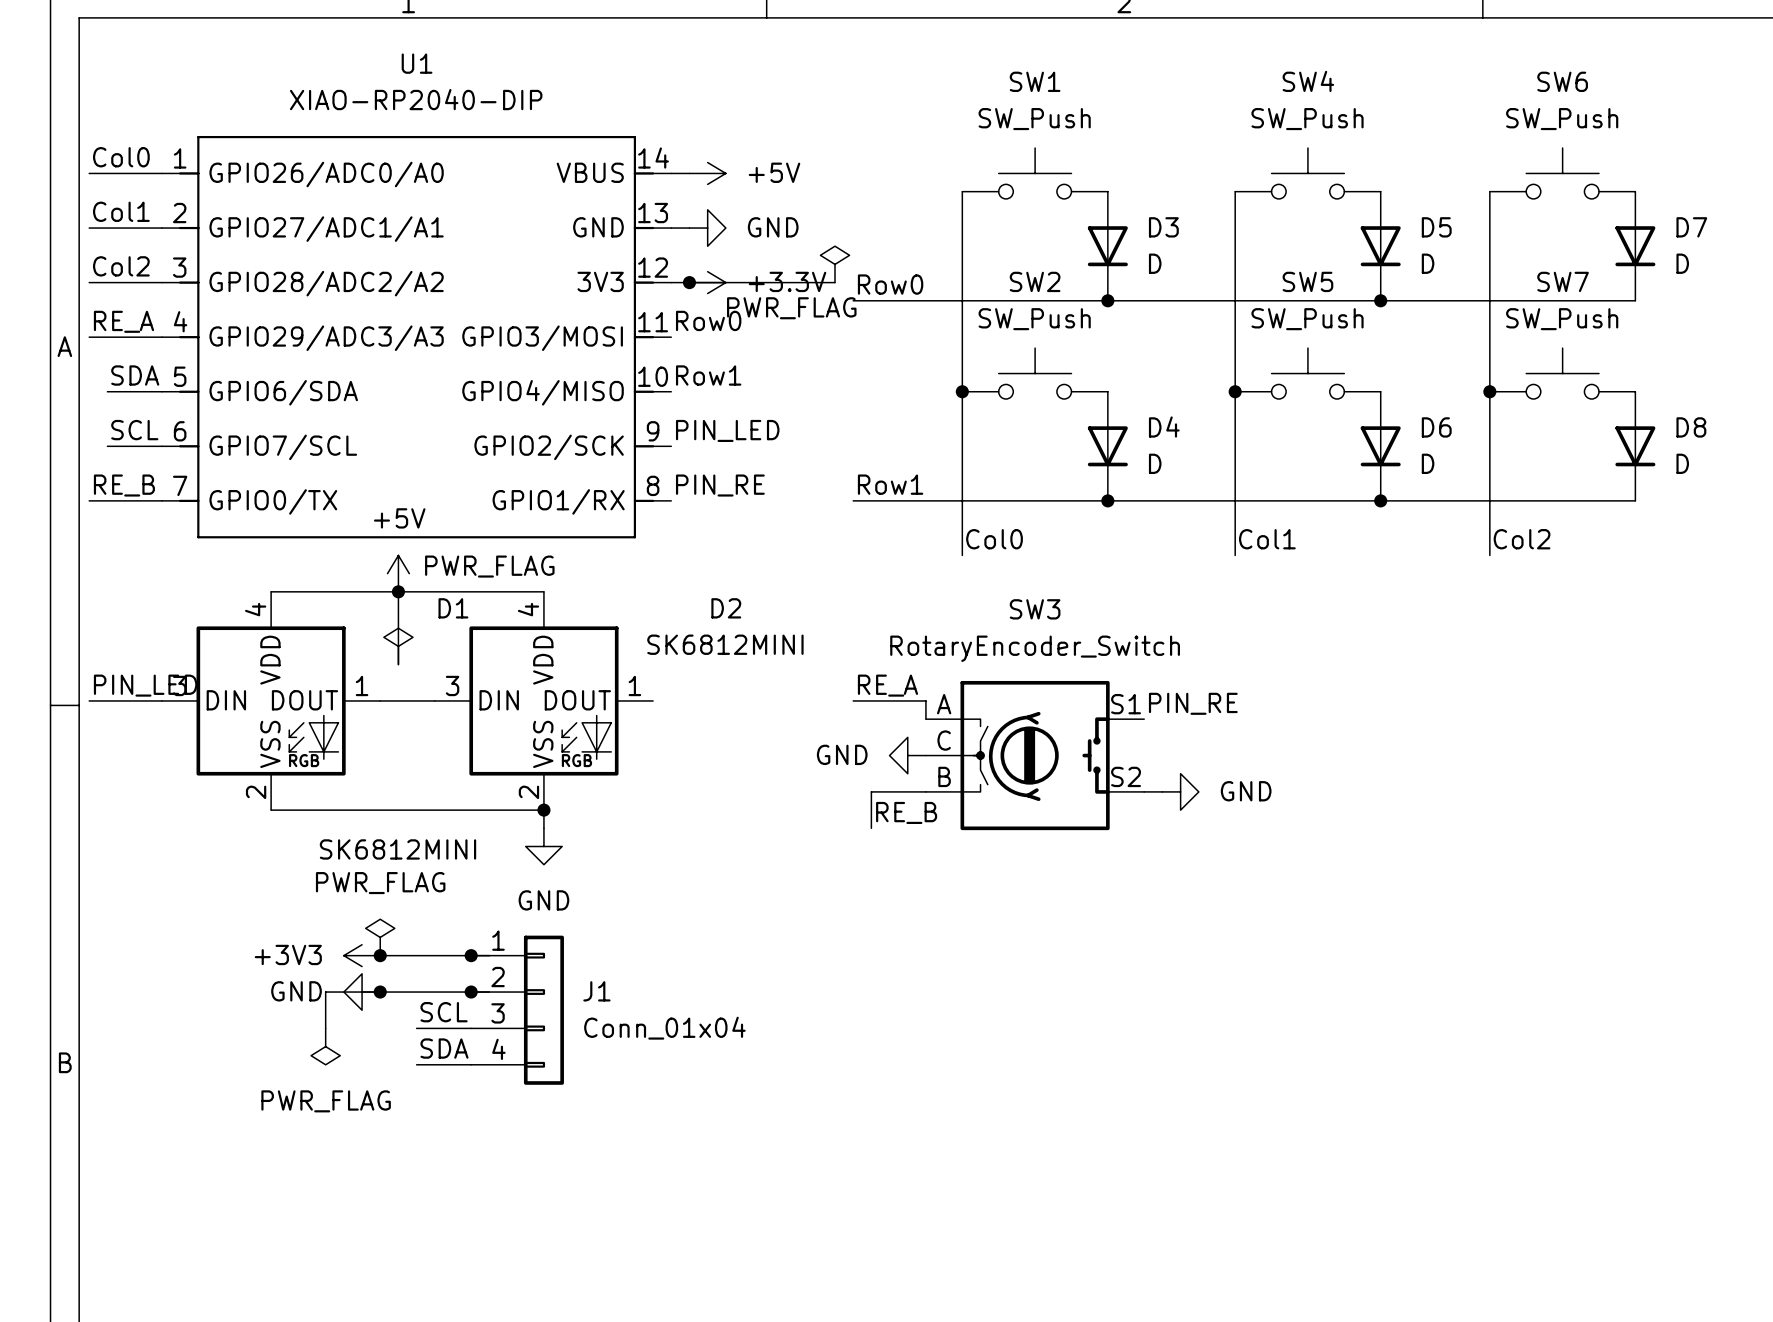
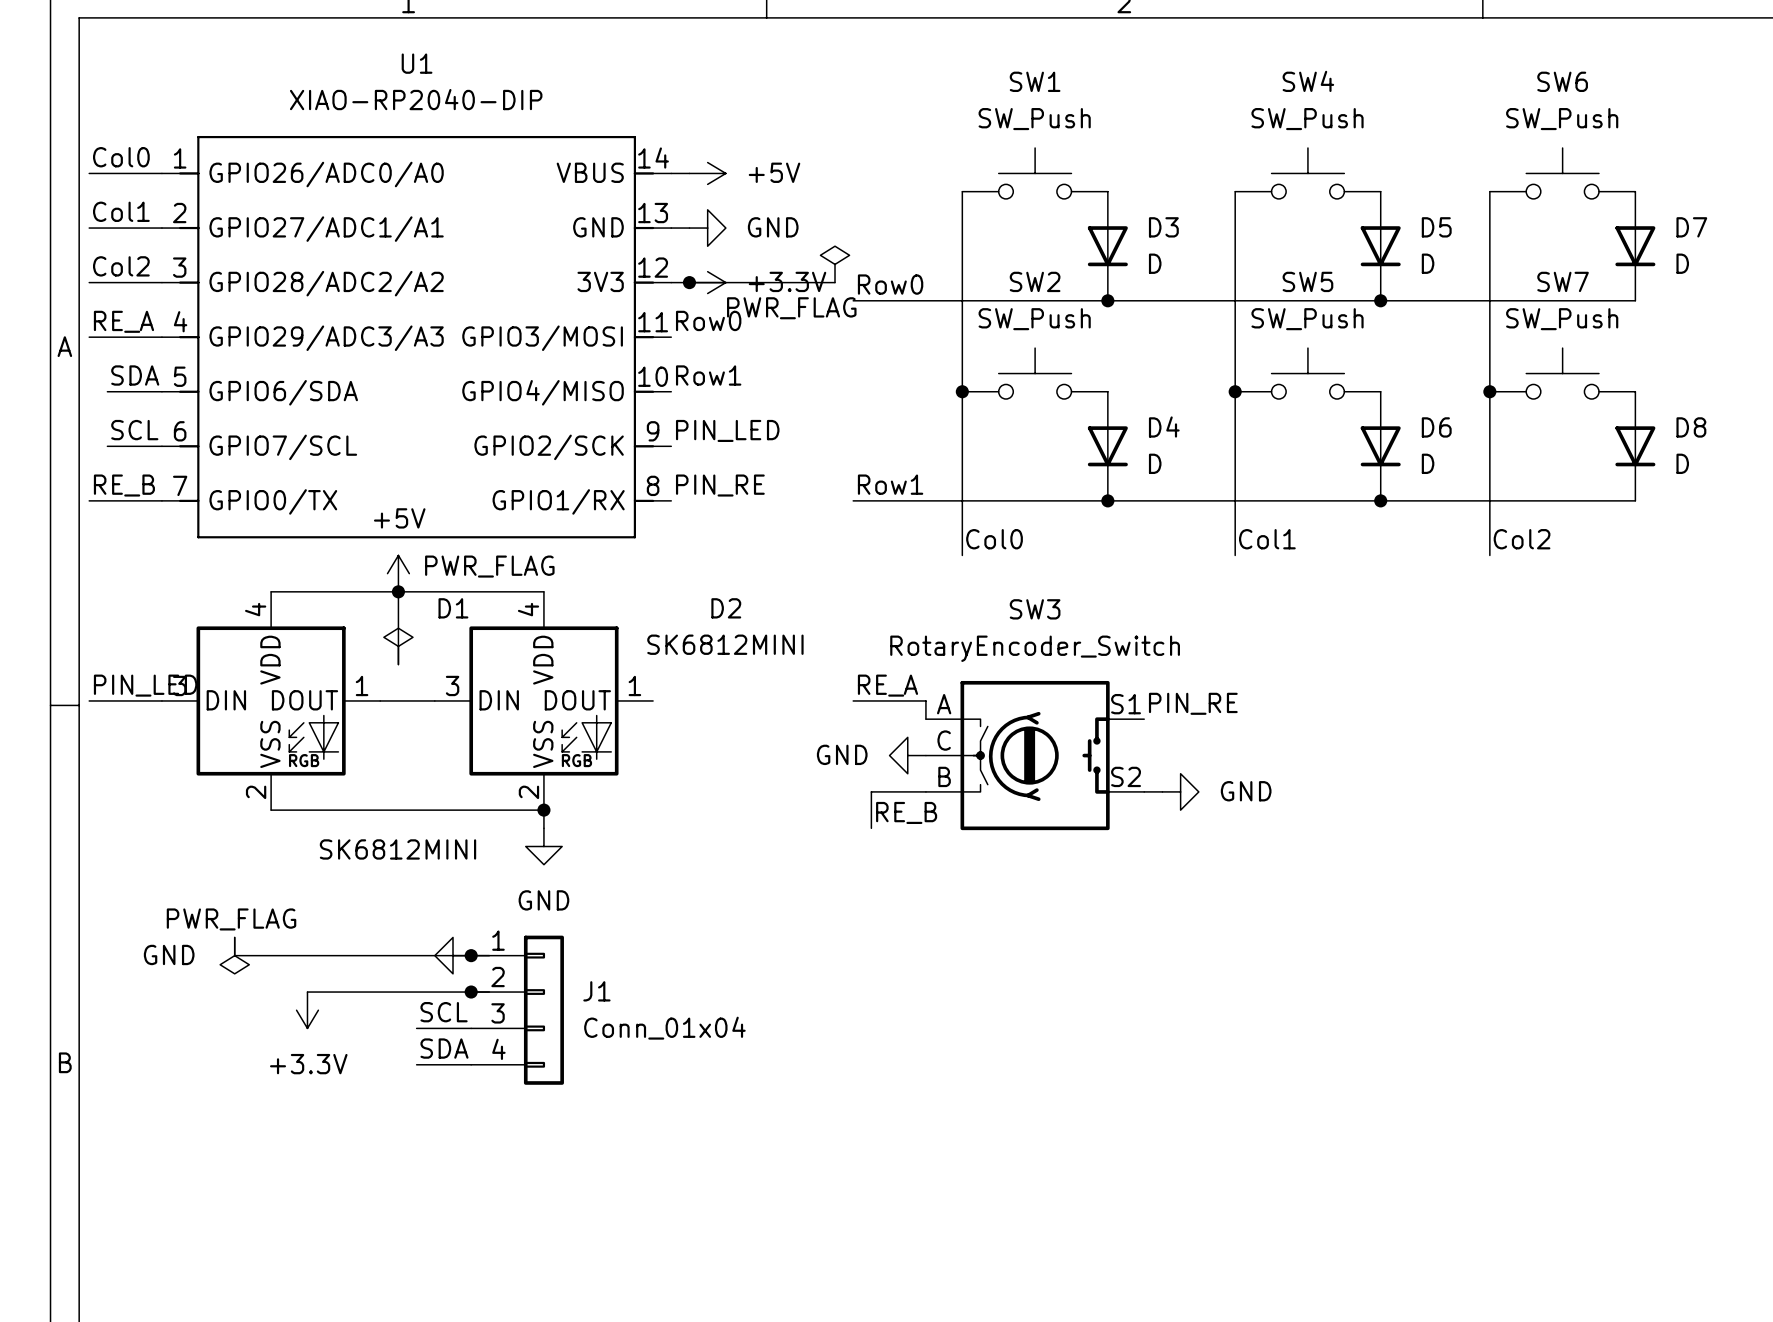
wire: none -> (234, 937) (234, 955) (380, 955)
power symbol: PWR_FLAG (380, 937) -> none
power symbol: none -> PWR_FLAG (234, 955)
power symbol: +3V3 (362, 955) -> none
junction: (380, 955) -> none
power symbol text position: GND (296, 991) -> GND (169, 954)
wire: (325, 992) (325, 1028) -> (325, 992) (307, 992)
power symbol position: GND (362, 992) -> GND (453, 955)
junction: (380, 992) -> none
power symbol: none -> +3.3V (307, 1010)
power symbol: PWR_FLAG (325, 1046) -> none

